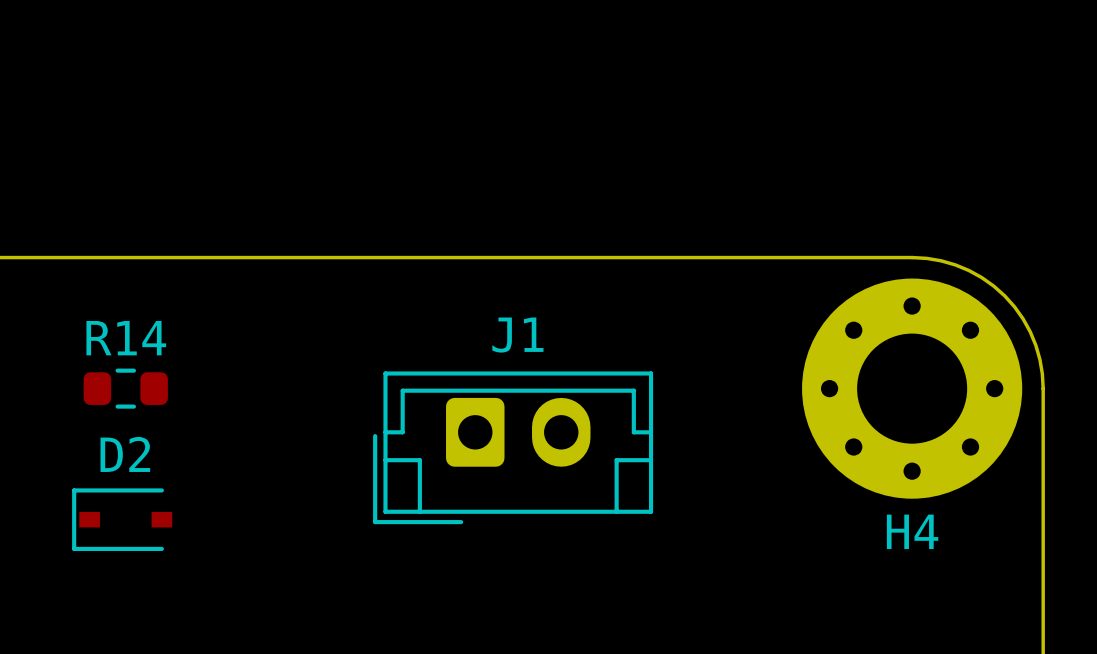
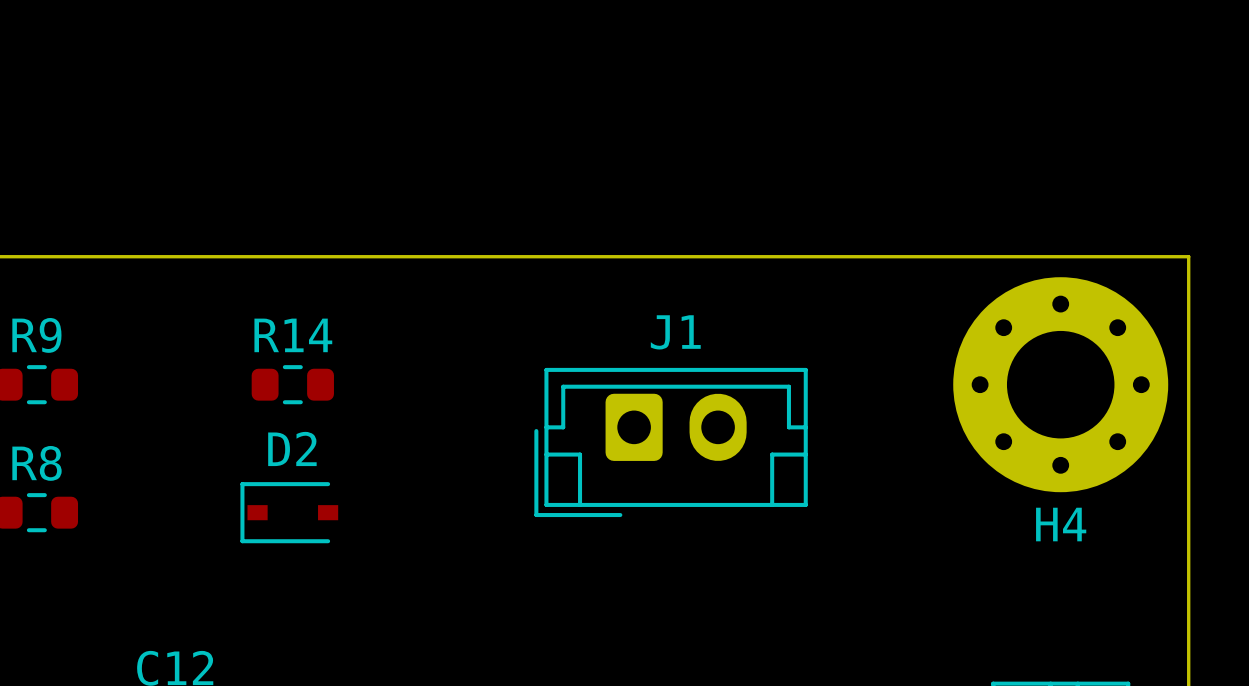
board edge: (912, 257) (941, 260) (955, 264) (981, 277) (1004, 295) (1023, 318) (1030, 331) (1039, 359) (1043, 388) -> (1060, 256) (1188, 256) (1188, 384)

